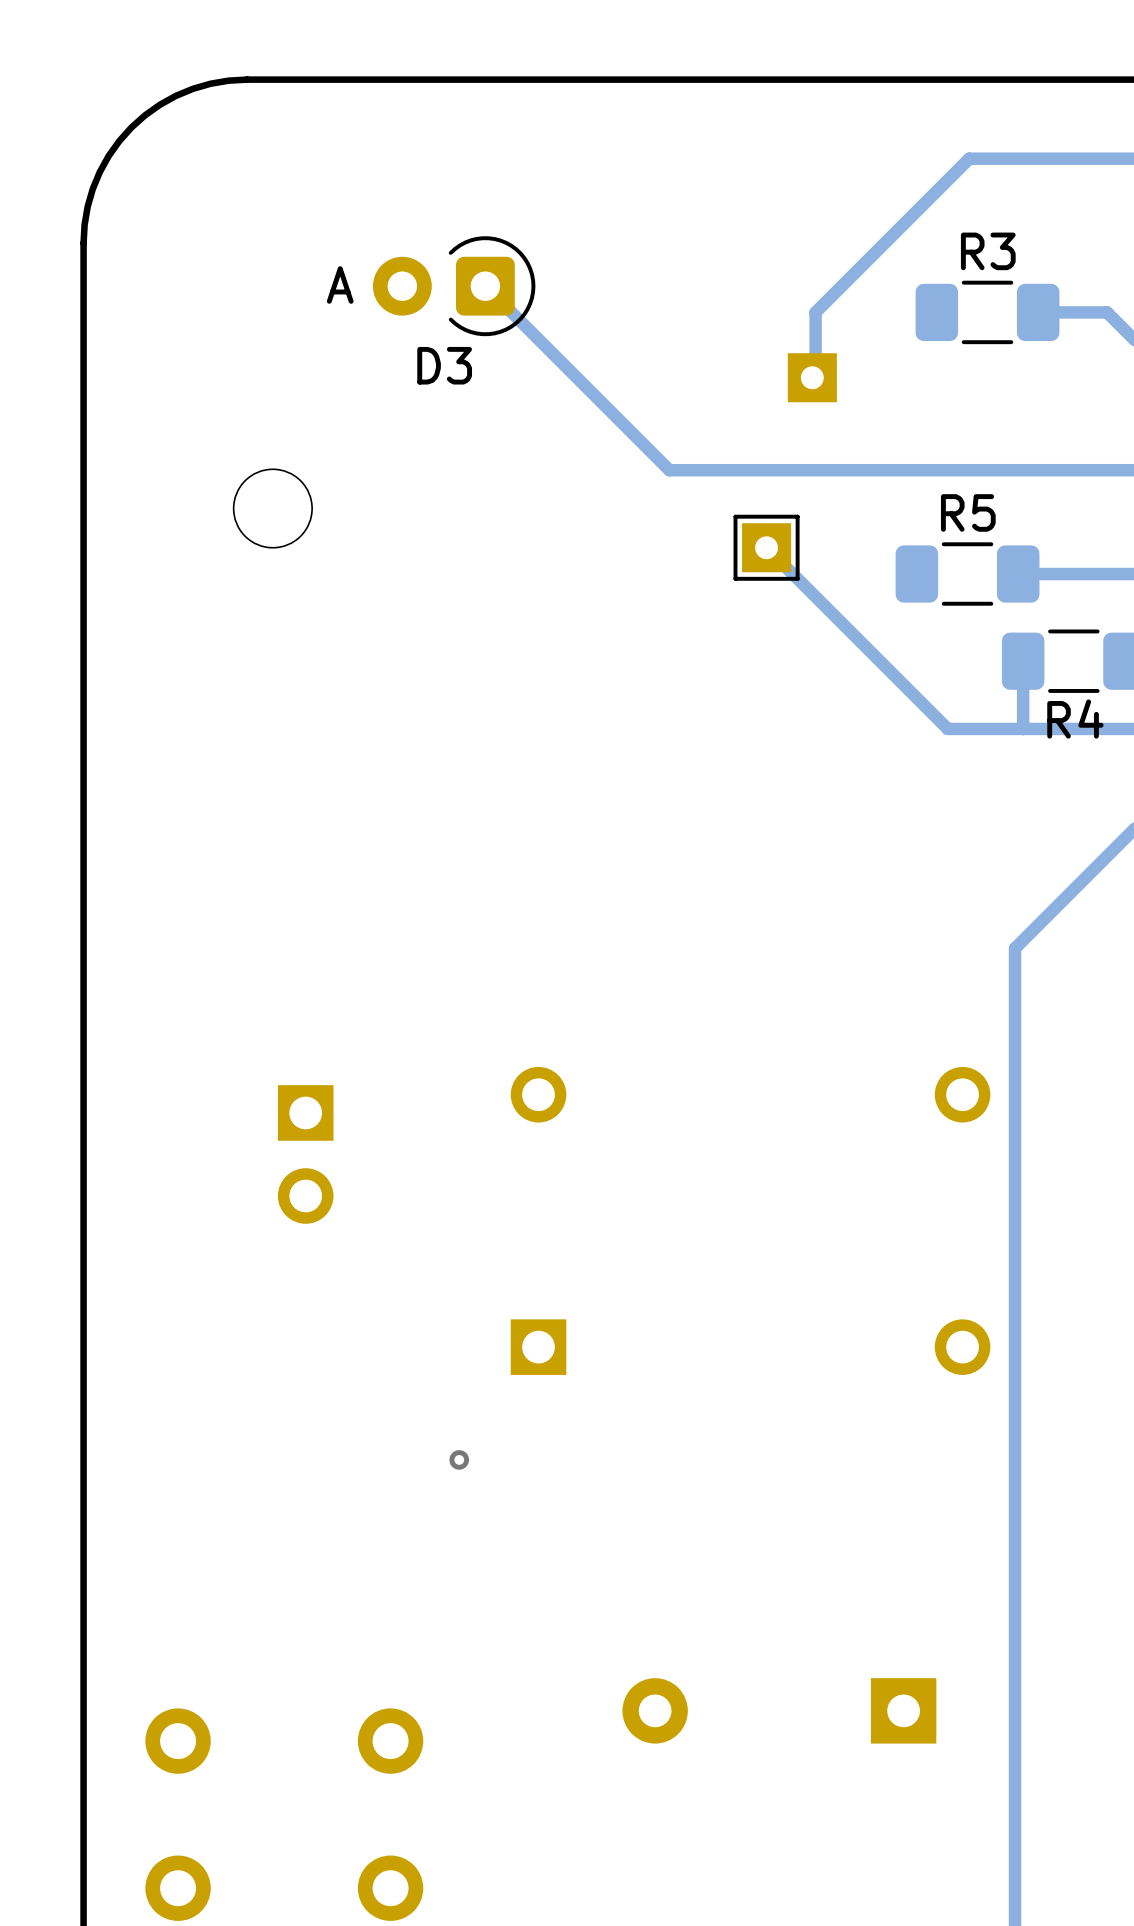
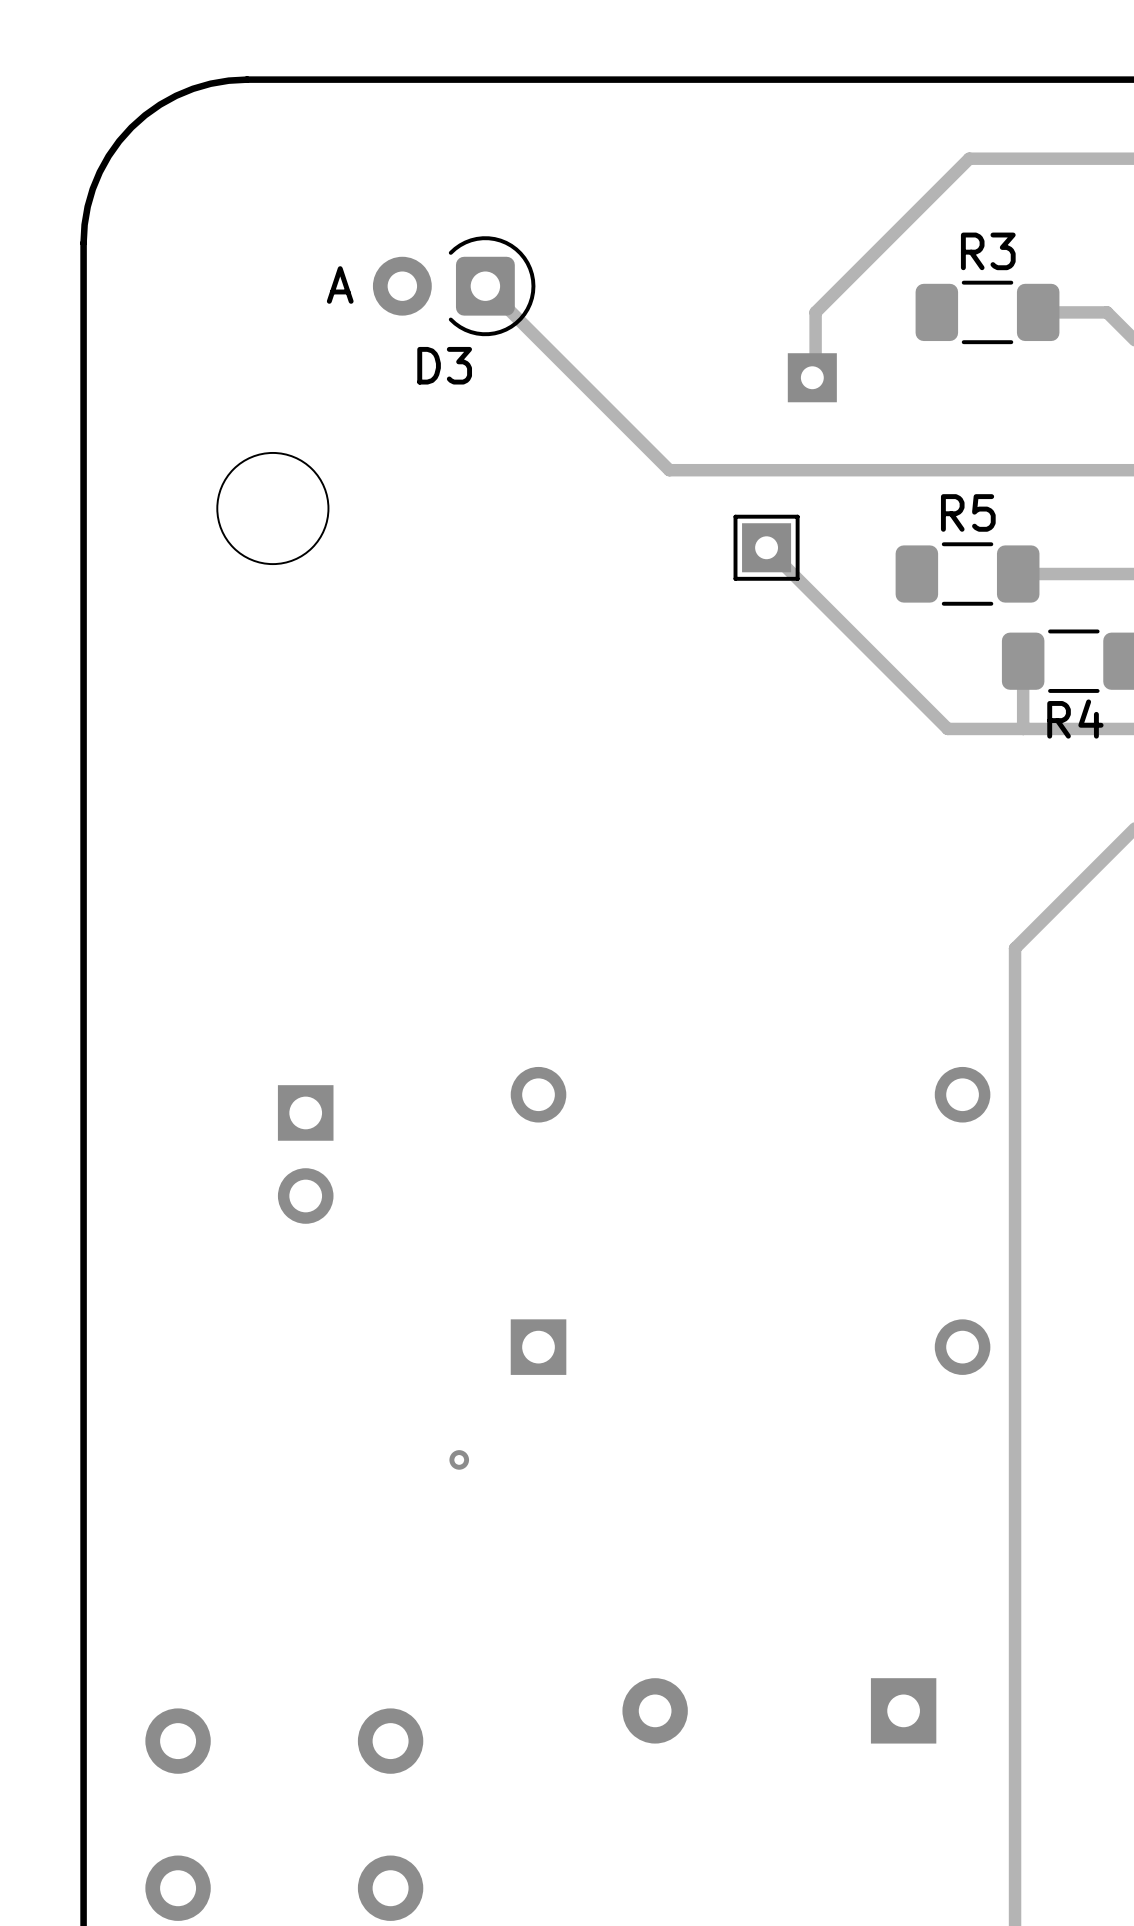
round board edge size: [232, 468, 313, 549] -> [216, 452, 330, 565]

